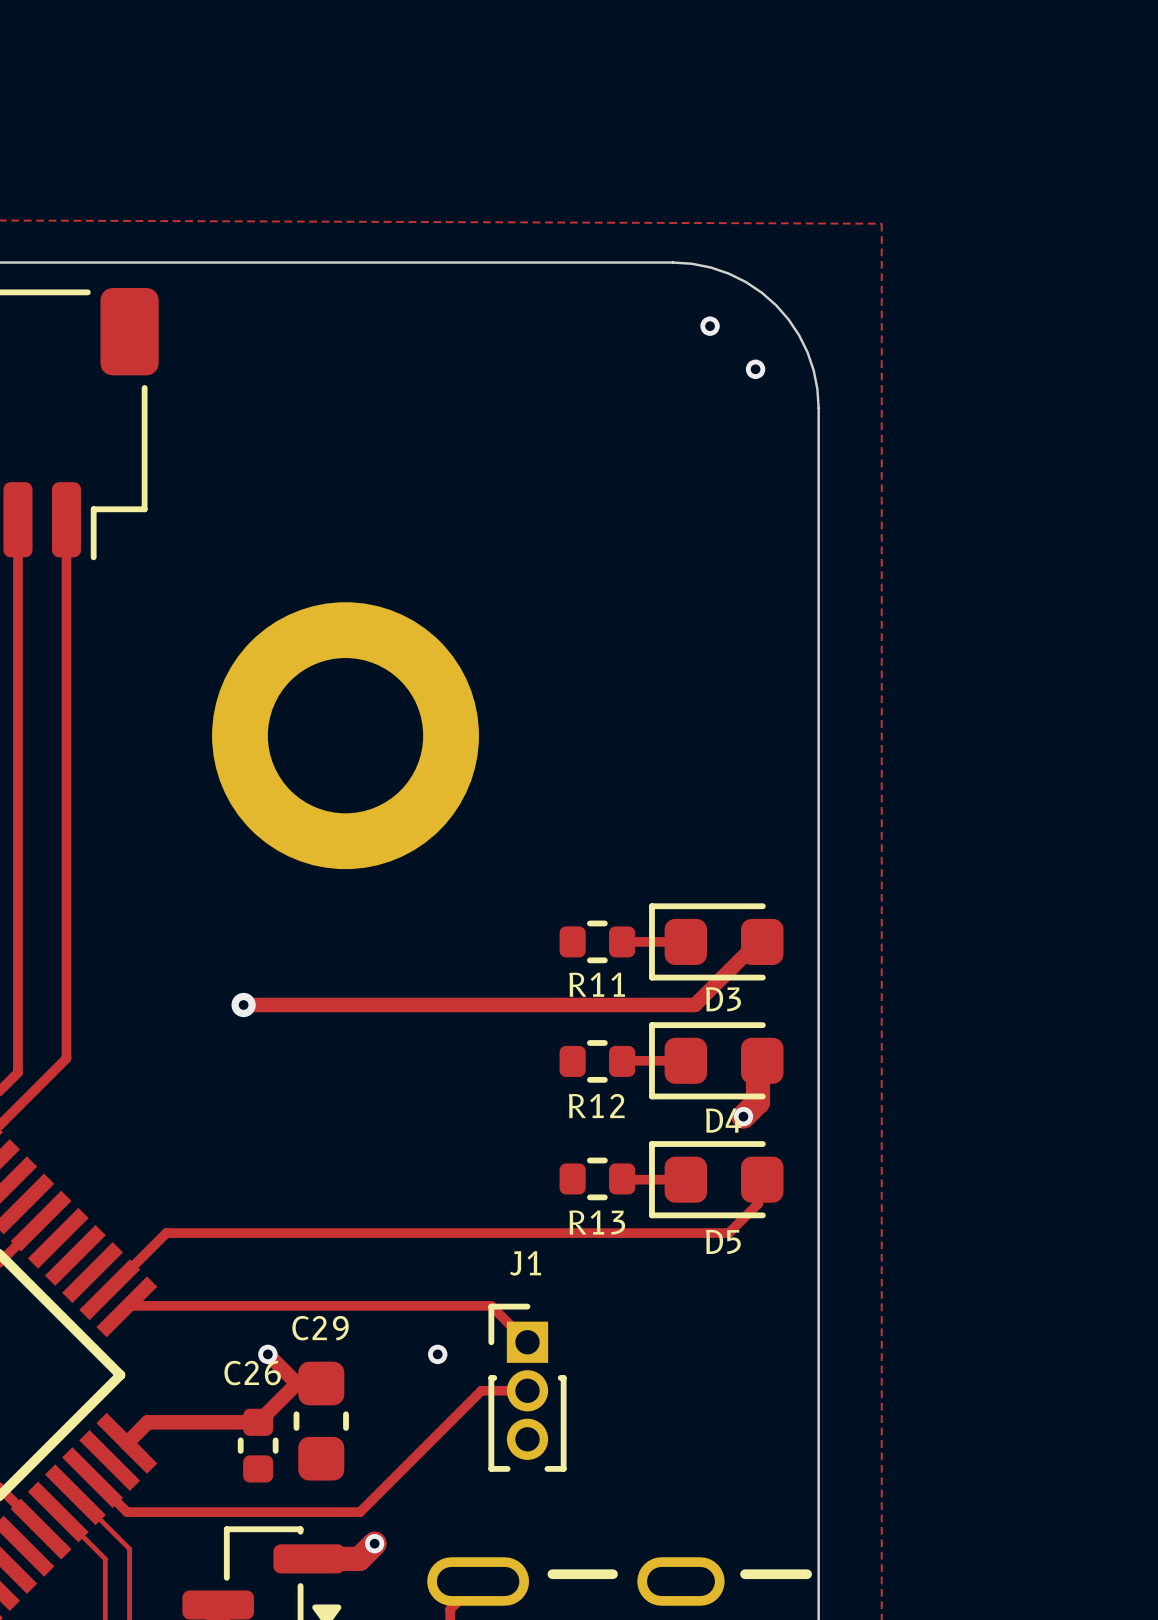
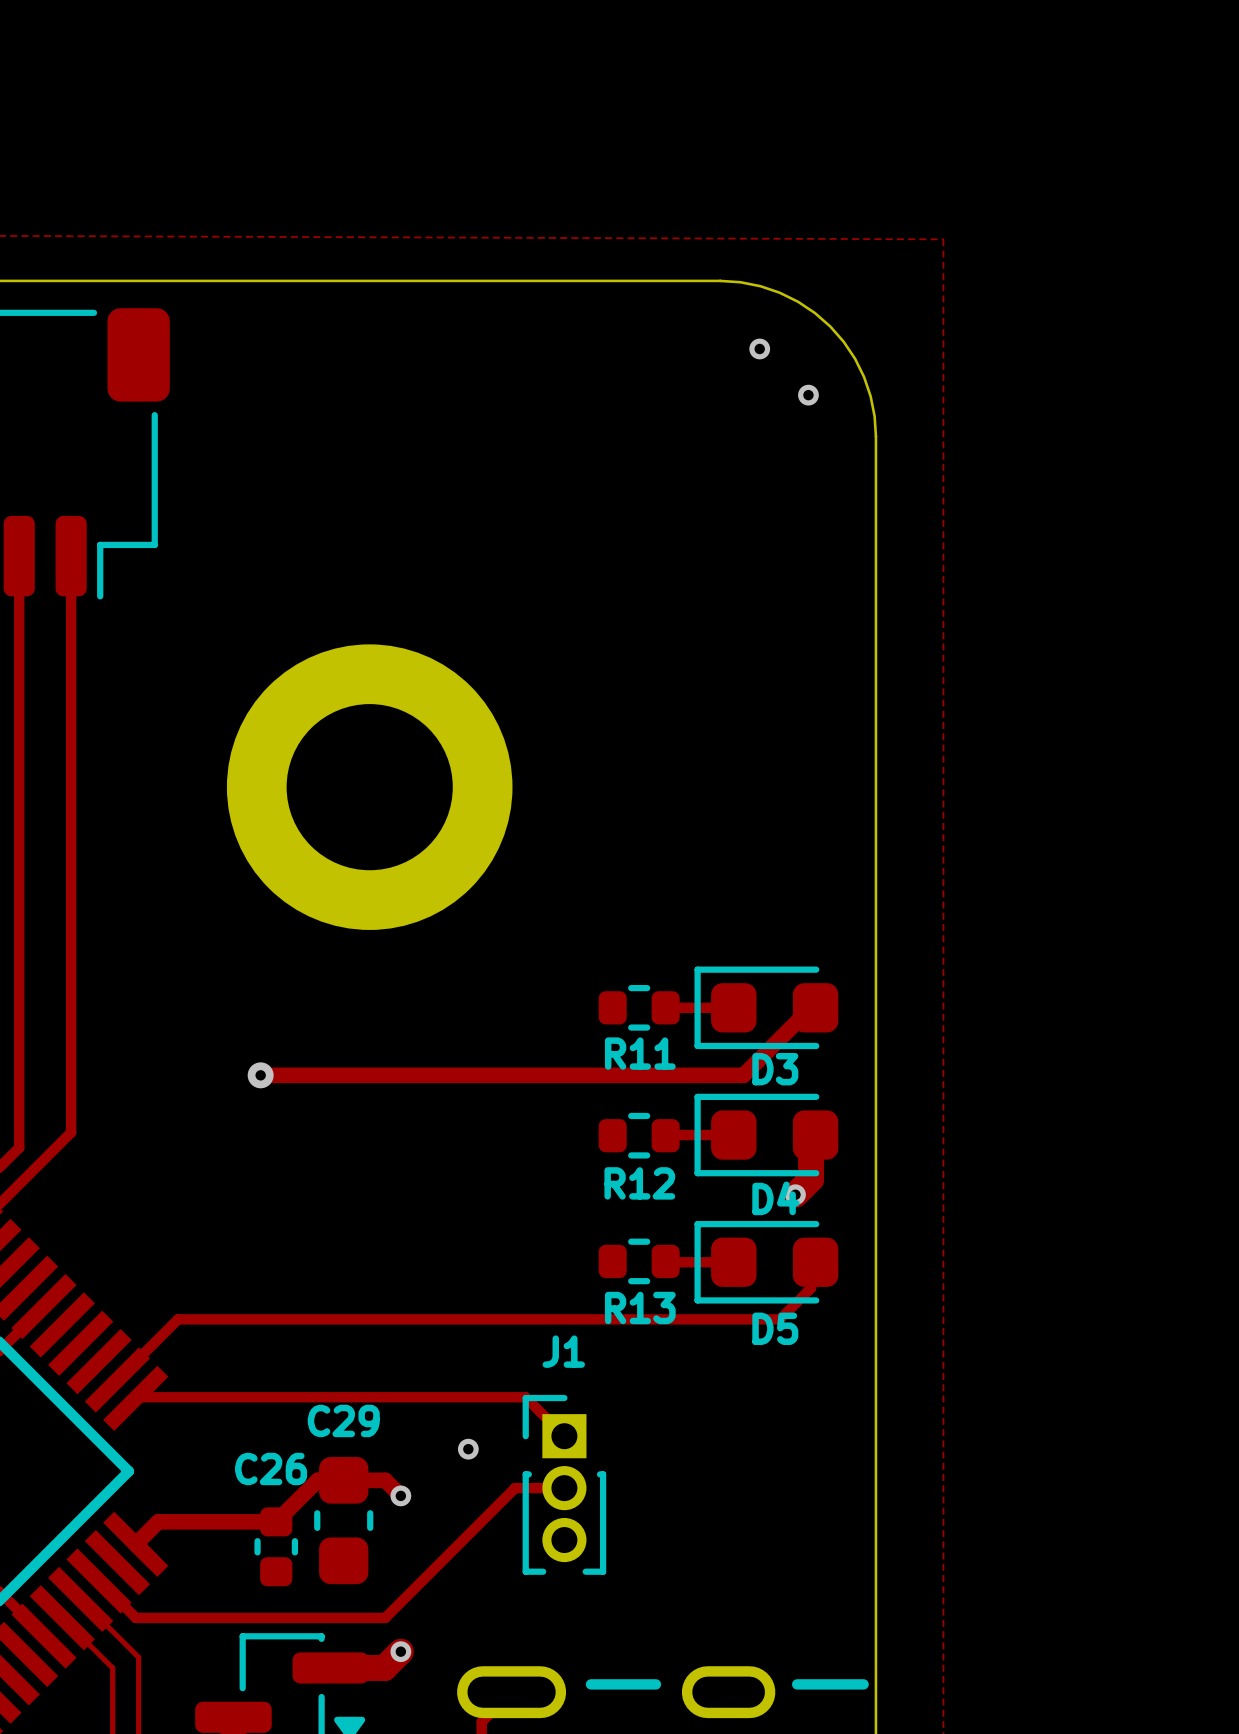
track: (267, 1354) (296, 1383) -> none
via position: (267, 1354) -> (400, 1495)
track: none -> (343, 1480) (385, 1480) (400, 1495)

